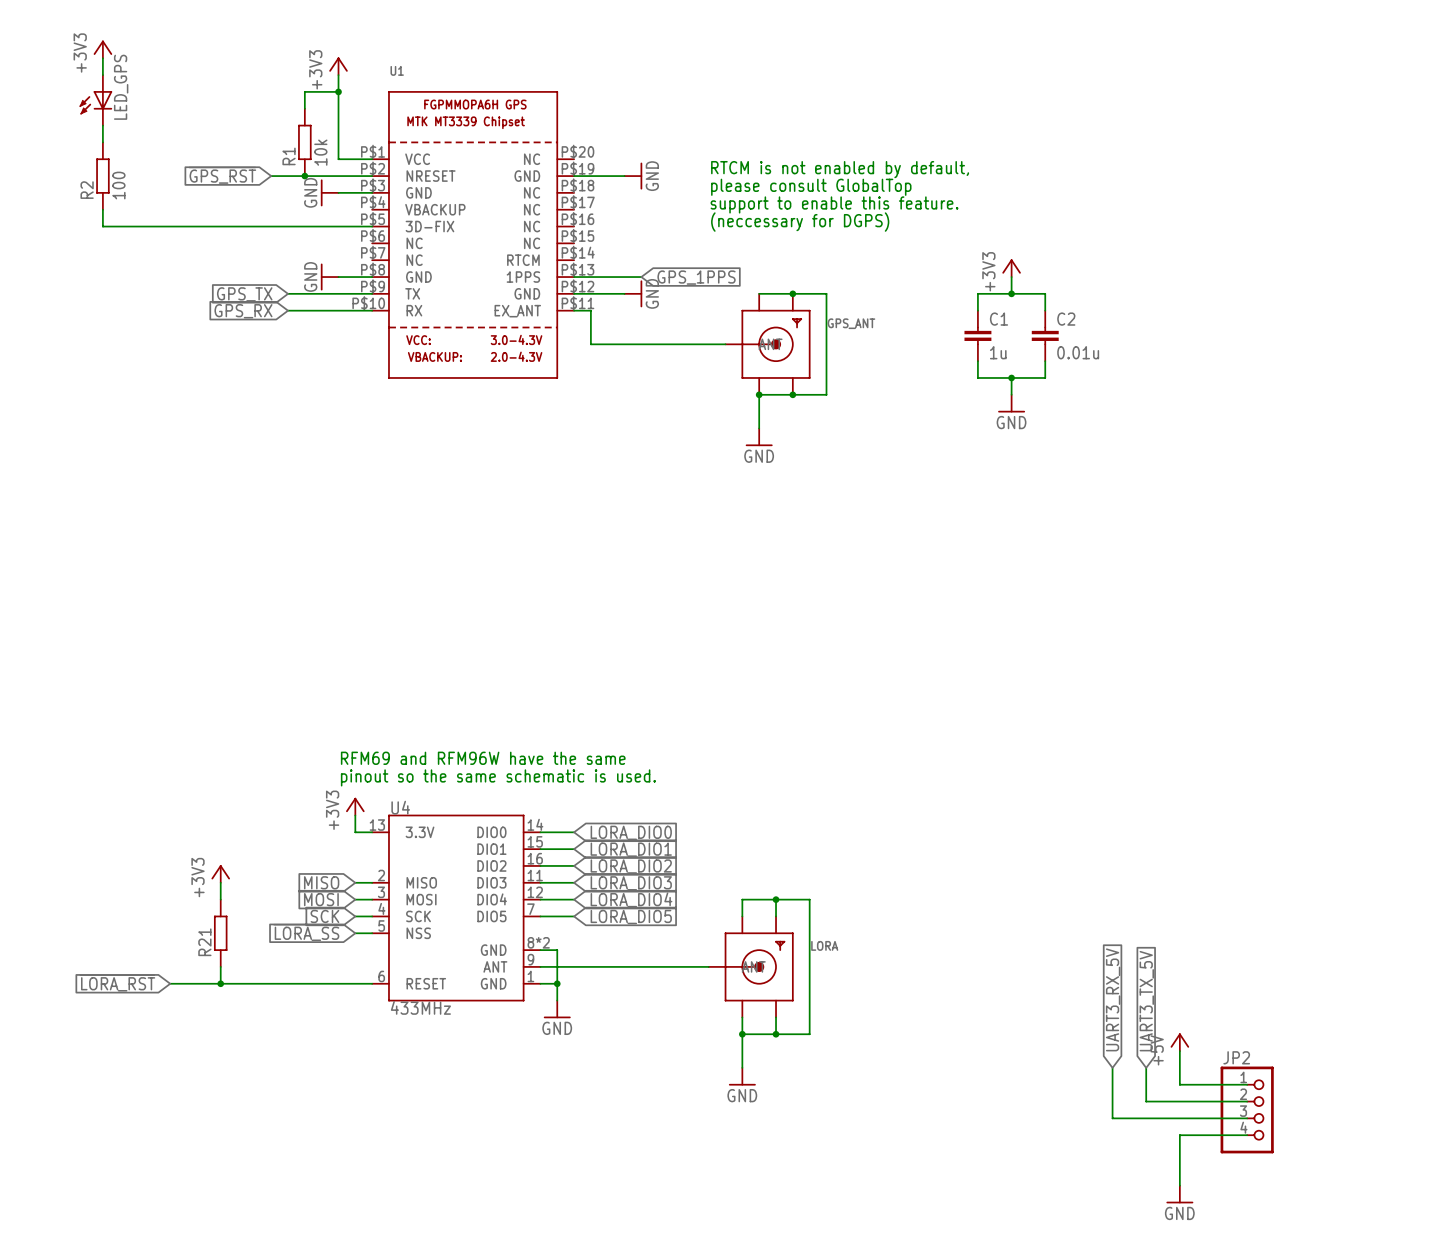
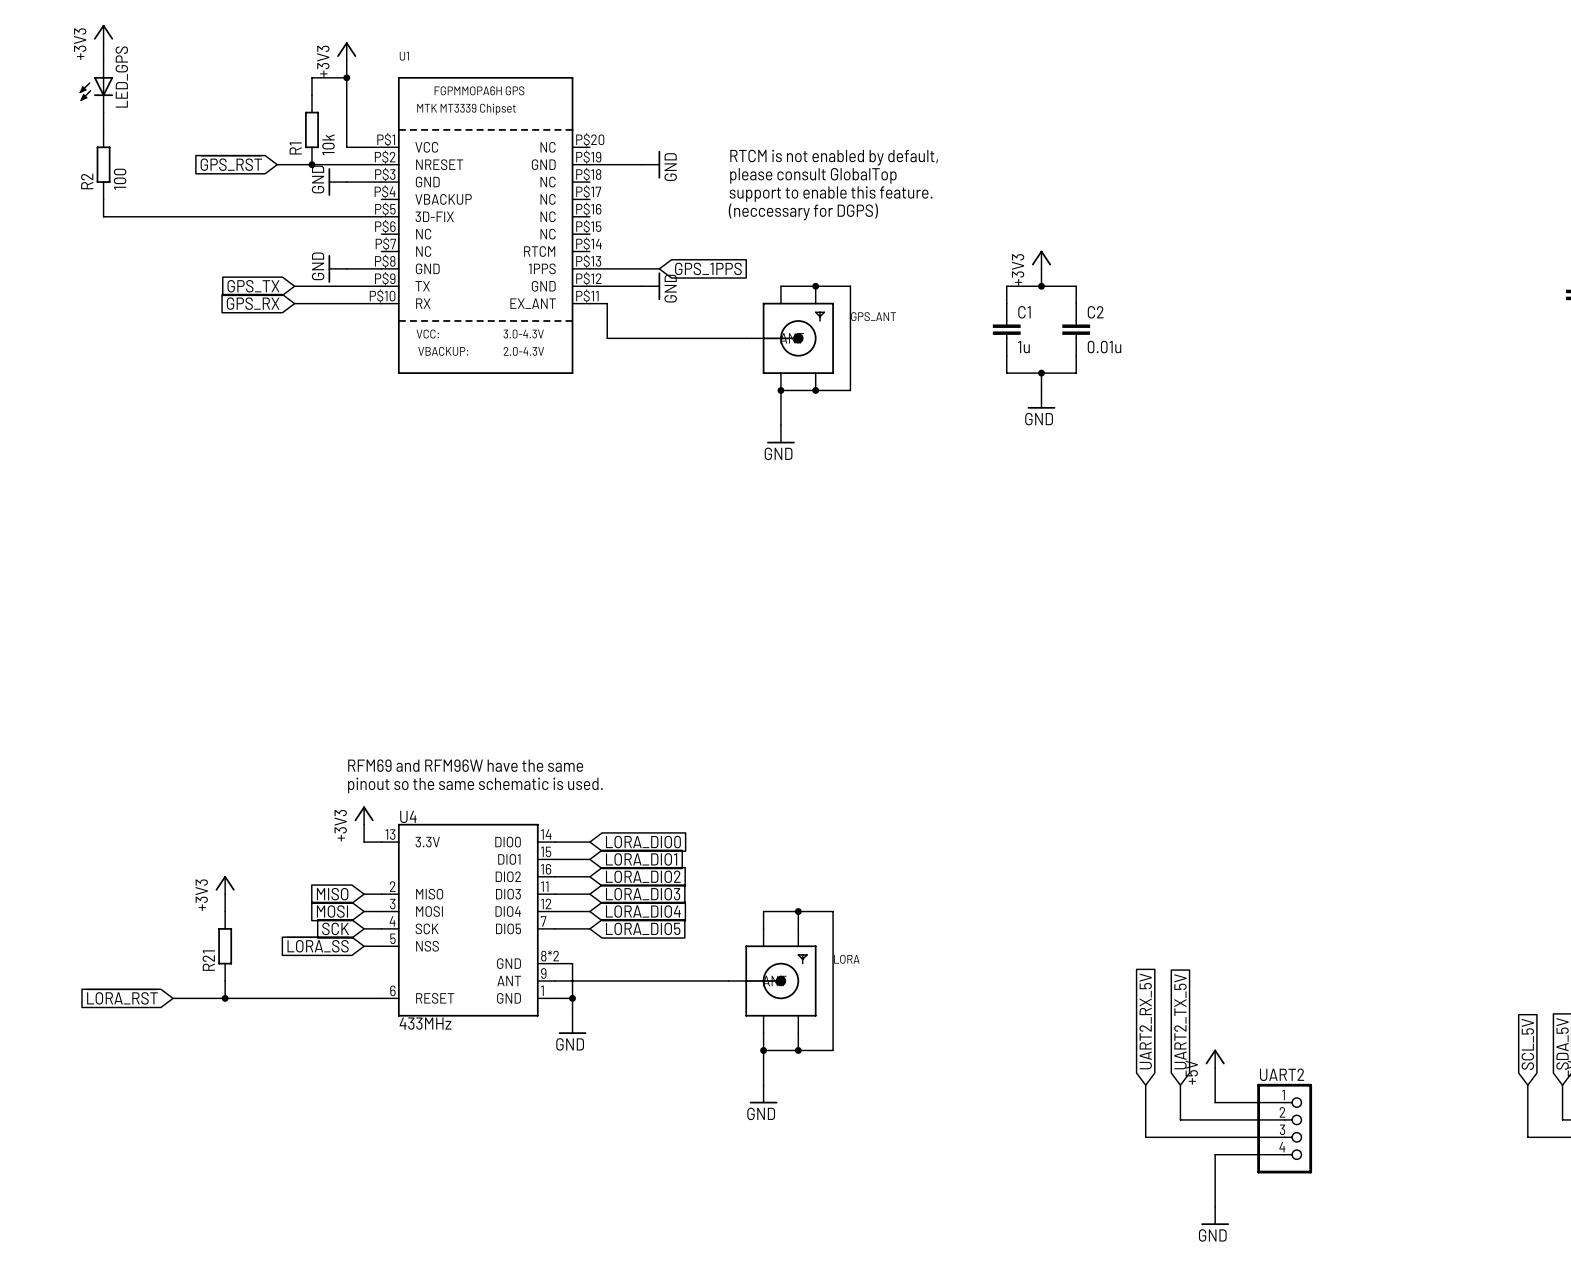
global label: UART3_RX_5V (1113, 999) -> UART2_RX_5V (1145, 1021)
global label: UART3_TX_5V (1146, 1001) -> UART2_TX_5V (1180, 1021)
JP2 name: JP2 (1236, 1057) -> UART2 (1282, 1074)

